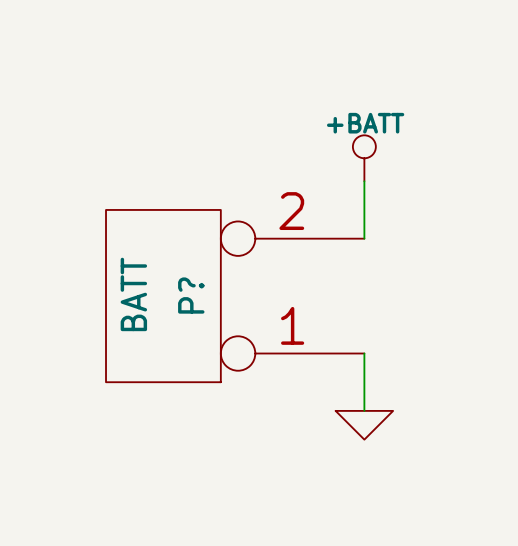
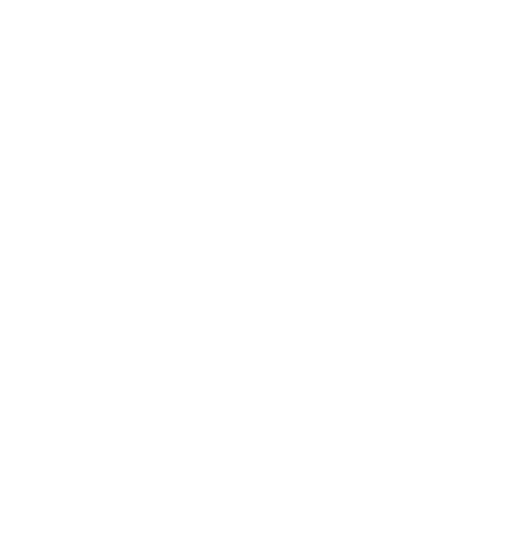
power symbol: +BATT (364, 158) -> none
wire: (364, 181) (364, 238) -> none
P?: BATT (235, 296) -> none
wire: (364, 353) (364, 410) -> none
power symbol: (364, 425) -> none

